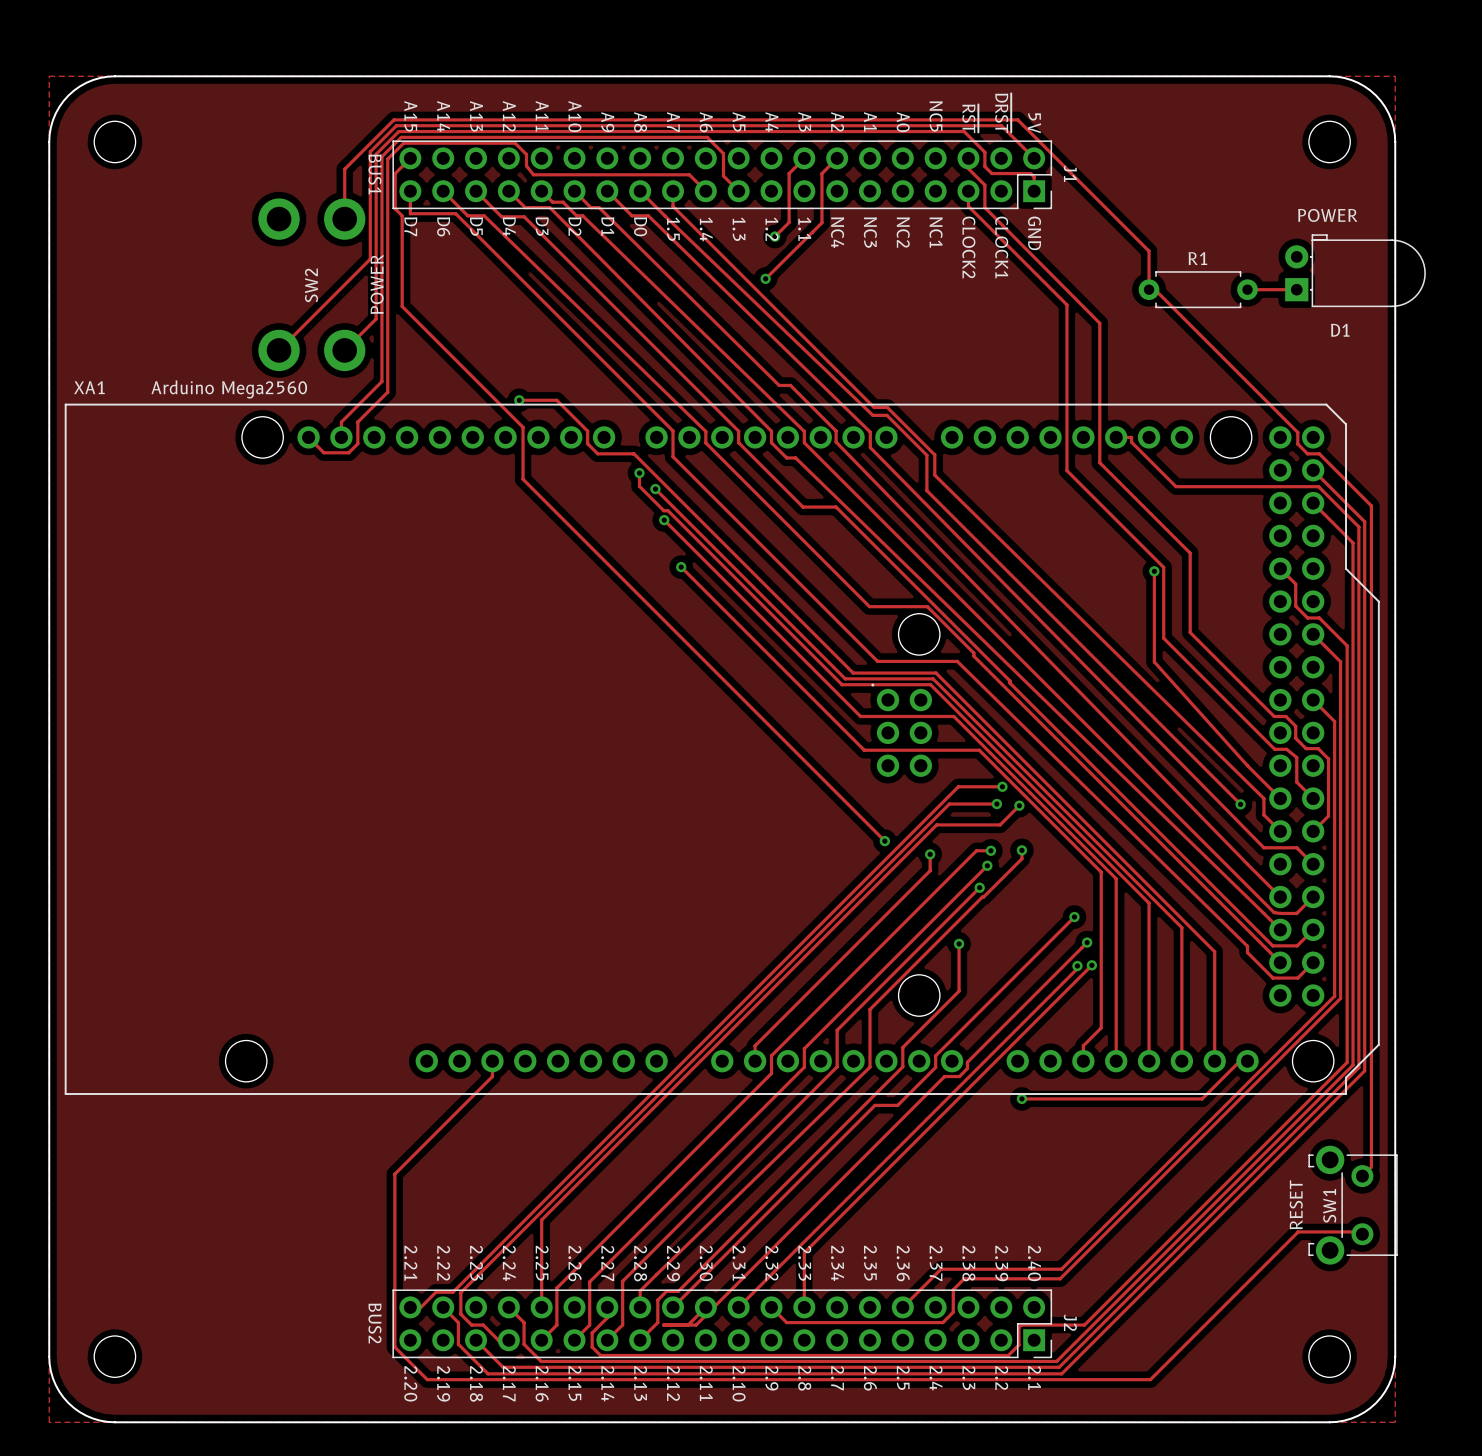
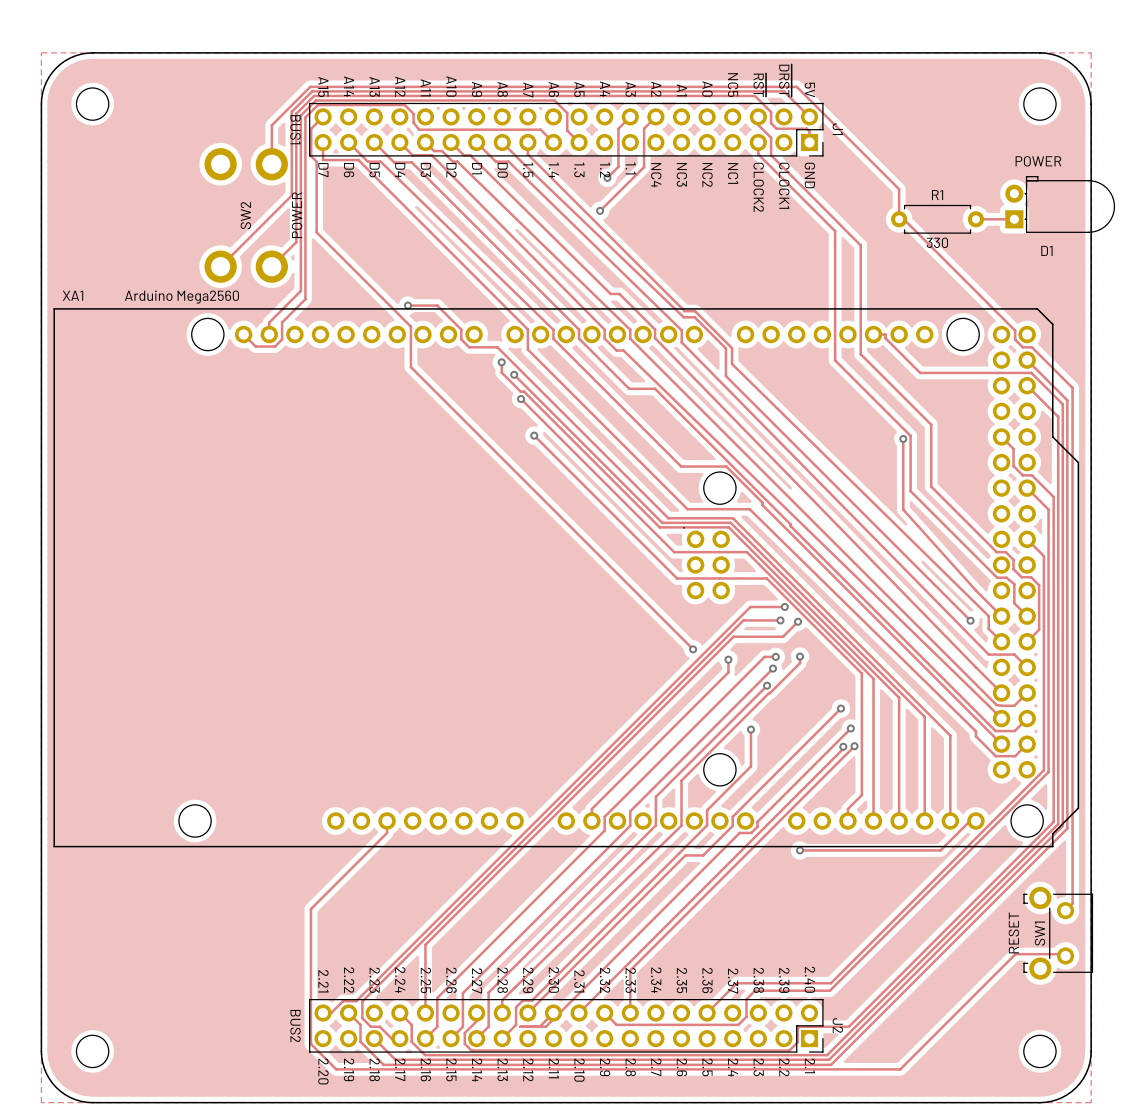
R1 value: none -> 330 (937, 242)

